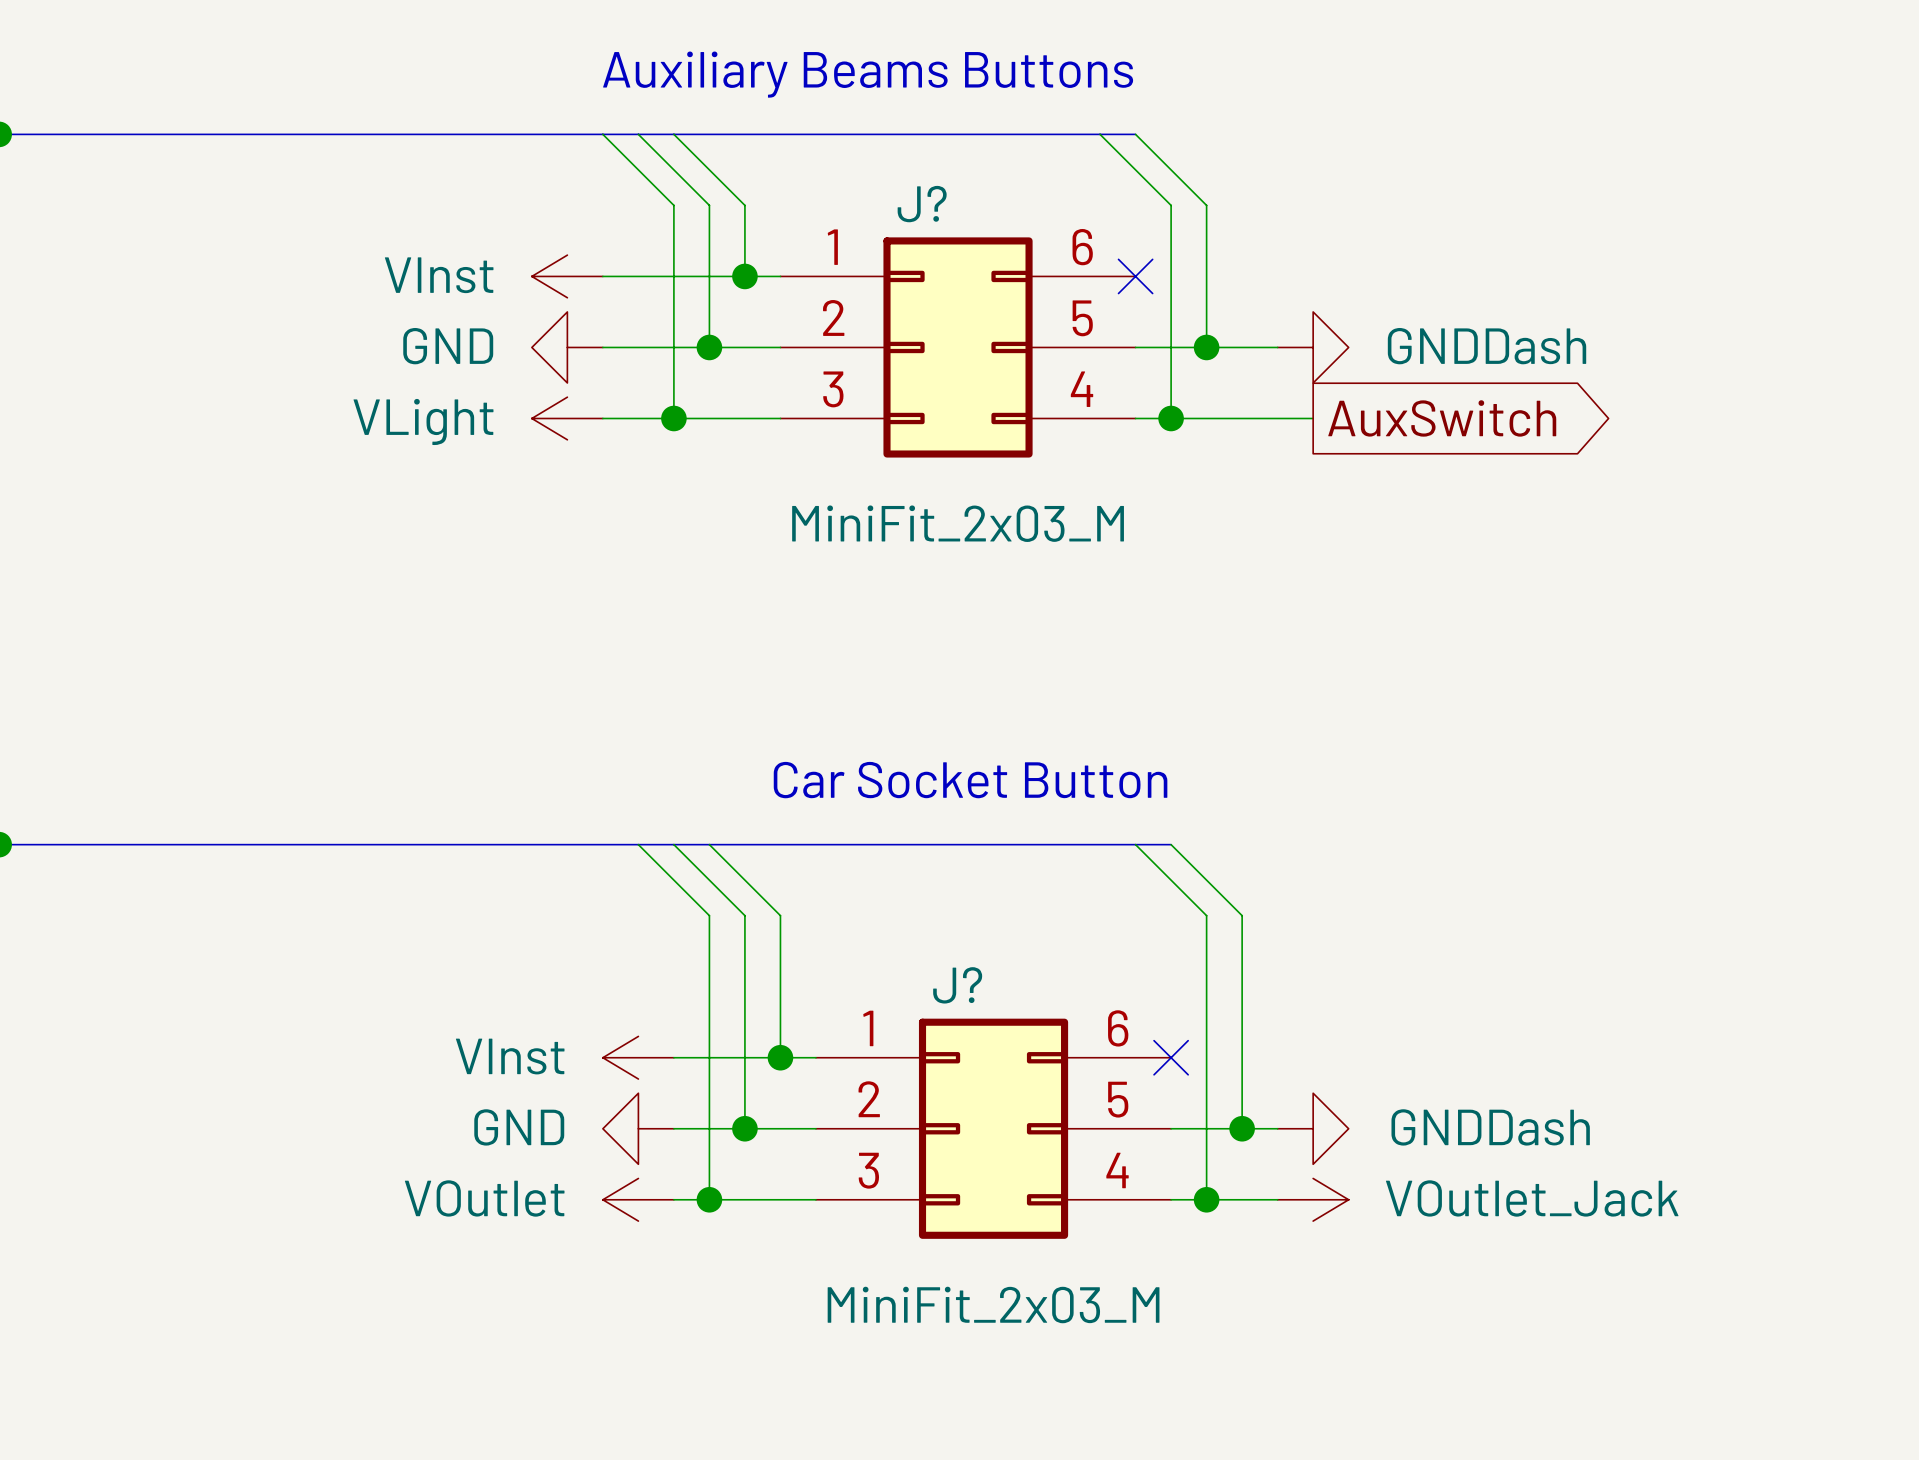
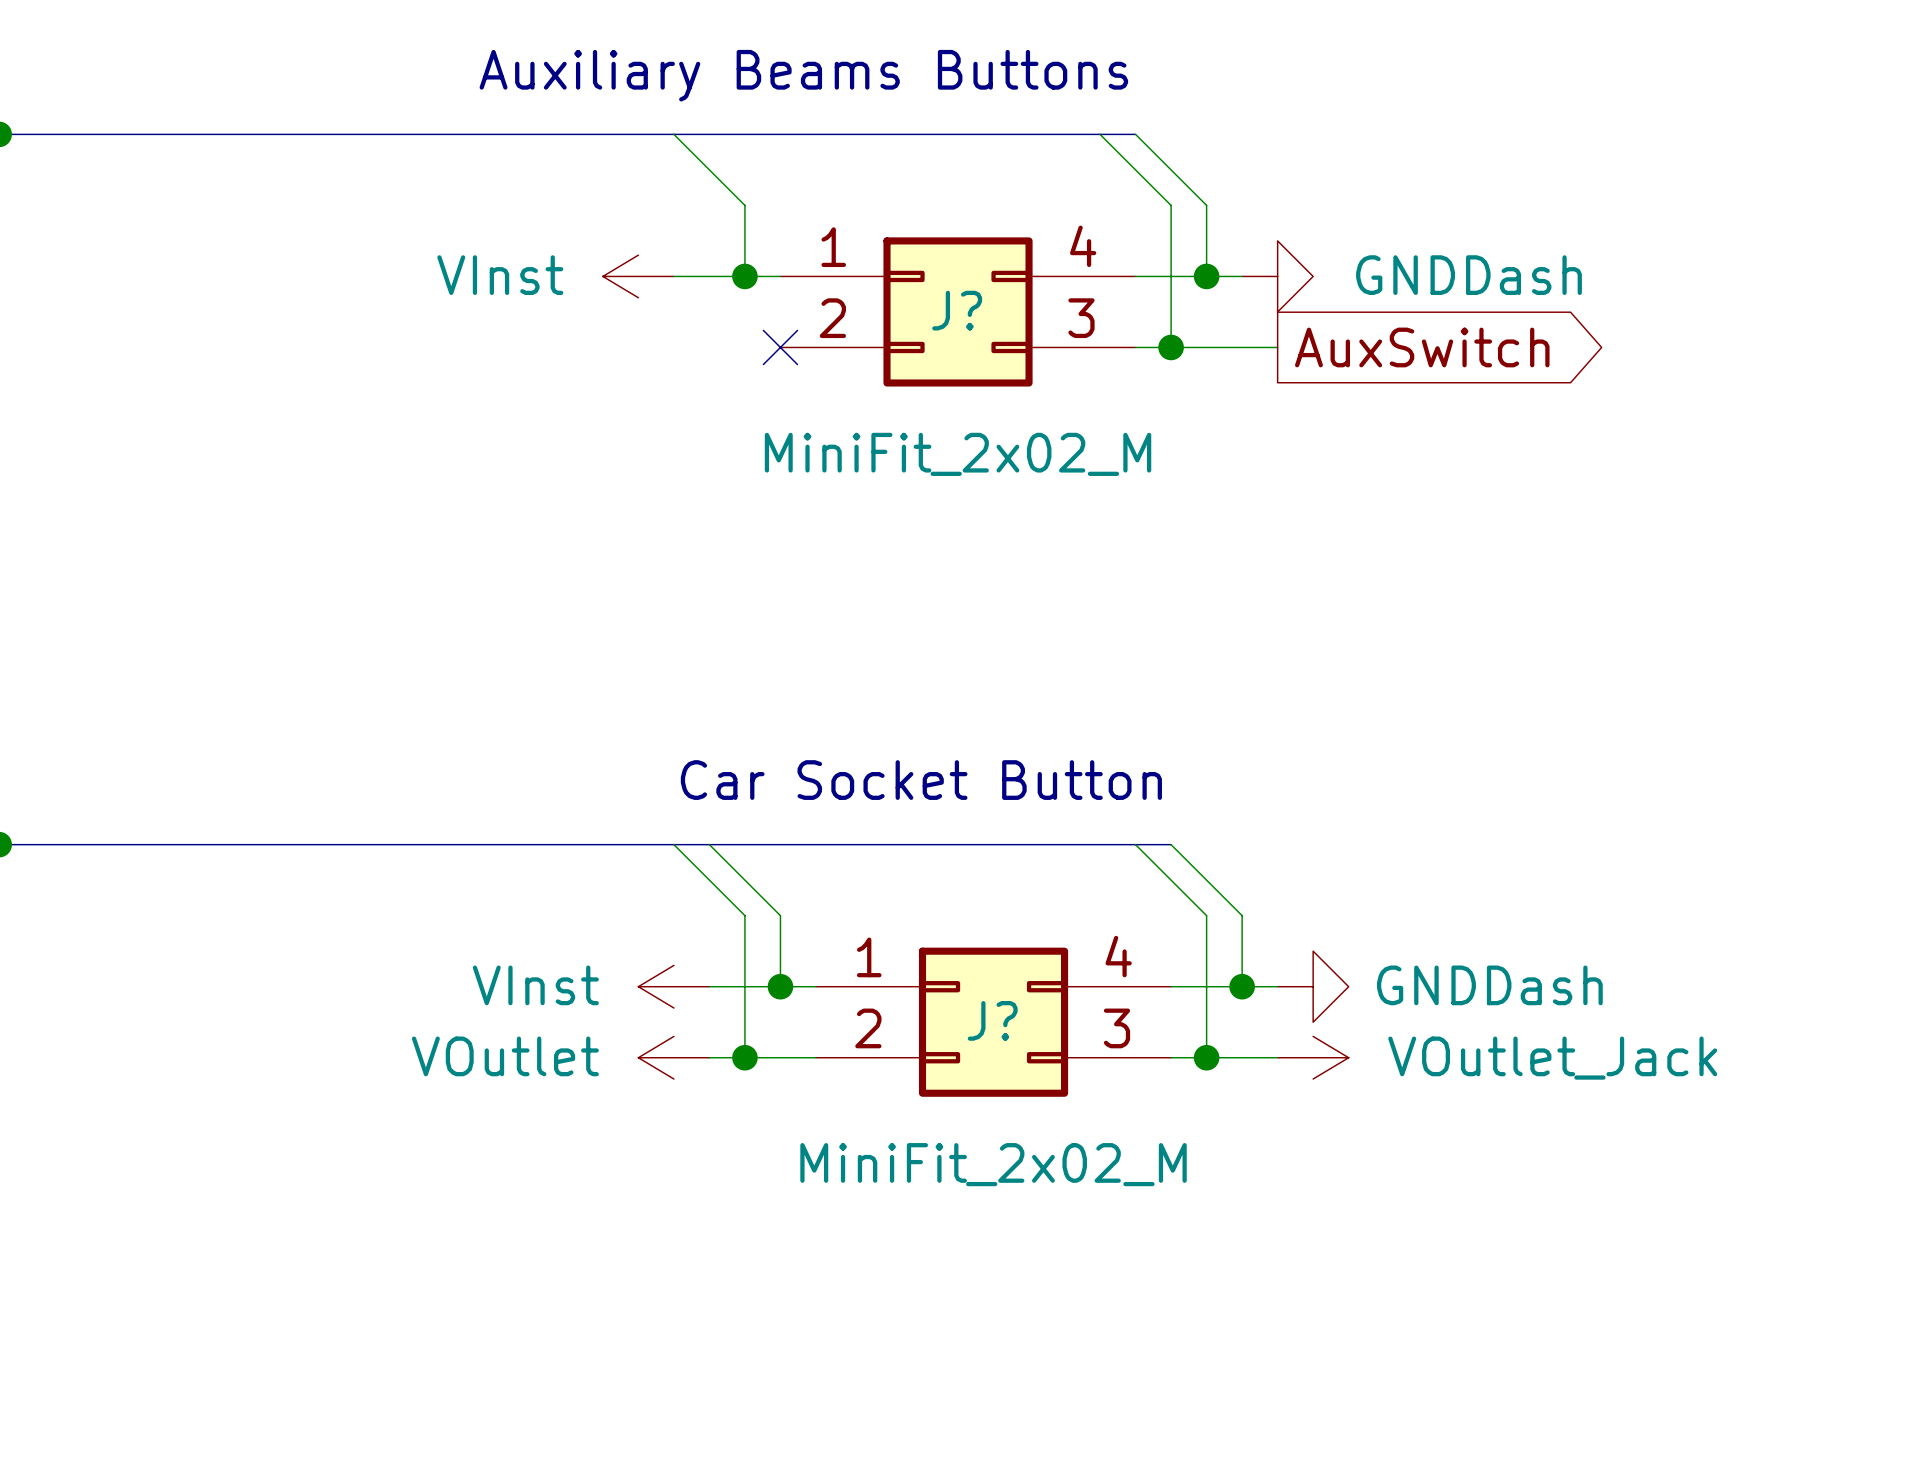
wire: (602, 134) (673, 205) (673, 418) -> none
wire: (638, 134) (709, 205) (709, 347) -> none
power symbol position: VInst (567, 276) -> VInst (638, 276)
wire: none -> (1135, 276) (1242, 276)
no-connect mark: (1135, 276) -> none
wire: (1206, 276) (1206, 347) -> none
junction: none -> (1206, 276)
J?: none -> MiniFit_2x02_M (958, 311)
power symbol: GND (567, 347) -> none
wire: (602, 347) (780, 347) -> none
junction: (709, 347) -> none
no-connect mark: none -> (780, 347)
J?: MiniFit_2x03_M (958, 347) -> none
wire: (1171, 347) (1171, 418) -> none
junction: none -> (1171, 347)
junction: (1206, 347) -> none
power symbol position: GNDDash (1313, 347) -> GNDDash (1277, 276)
power symbol: VLight (567, 418) -> none
wire: (602, 418) (780, 418) -> none
junction: (673, 418) -> none
wire: (1135, 418) (1313, 418) -> none
junction: (1171, 418) -> none
global label position: AuxSwitch (1442, 418) -> AuxSwitch (1422, 347)
wire: (638, 844) (709, 915) (709, 1199) -> none
wire: none -> (709, 986) (815, 986)
wire: (780, 986) (780, 1057) -> none
junction: none -> (780, 986)
wire: (1242, 986) (1242, 1128) -> none
junction: none -> (1242, 986)
J?: none -> MiniFit_2x02_M (993, 1022)
power symbol position: VInst (638, 1057) -> VInst (673, 986)
wire: (744, 1057) (744, 1128) -> none
junction: none -> (744, 1057)
junction: (780, 1057) -> none
no-connect mark: (1171, 1057) -> none
wire: (1206, 1057) (1206, 1199) -> none
junction: none -> (1206, 1057)
power symbol: GND (638, 1128) -> none
wire: (673, 1128) (815, 1128) -> none
junction: (744, 1128) -> none
J?: MiniFit_2x03_M (993, 1128) -> none
wire: (1171, 1128) (1277, 1128) -> (1171, 986) (1277, 986)
junction: (1242, 1128) -> none
power symbol position: GNDDash (1313, 1128) -> GNDDash (1313, 986)
power symbol position: VOutlet (638, 1199) -> VOutlet (673, 1057)
wire: (673, 1199) (815, 1199) -> none
junction: (709, 1199) -> none
wire: (1171, 1199) (1277, 1199) -> (1171, 1057) (1277, 1057)
junction: (1206, 1199) -> none
power symbol position: VOutlet_Jack (1313, 1199) -> VOutlet_Jack (1313, 1057)

